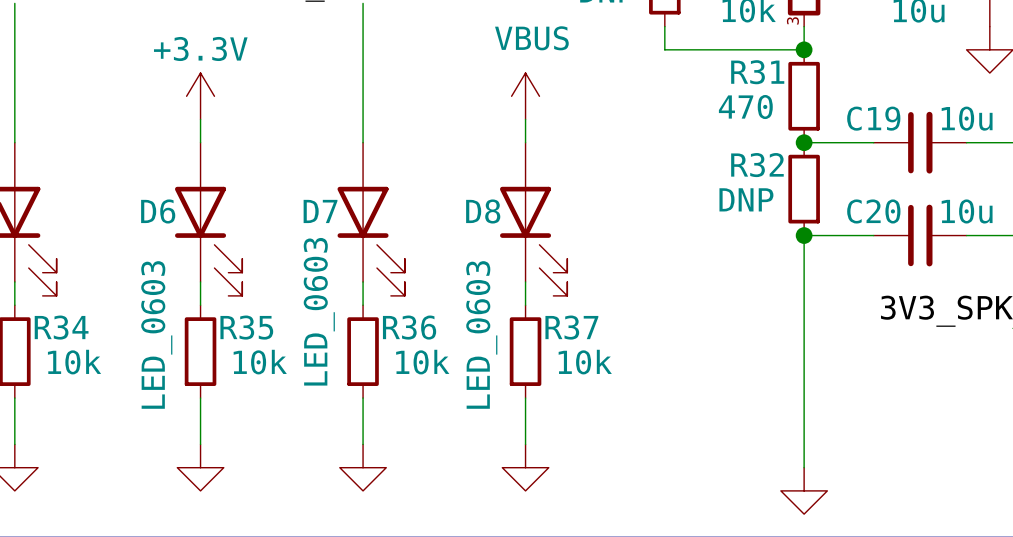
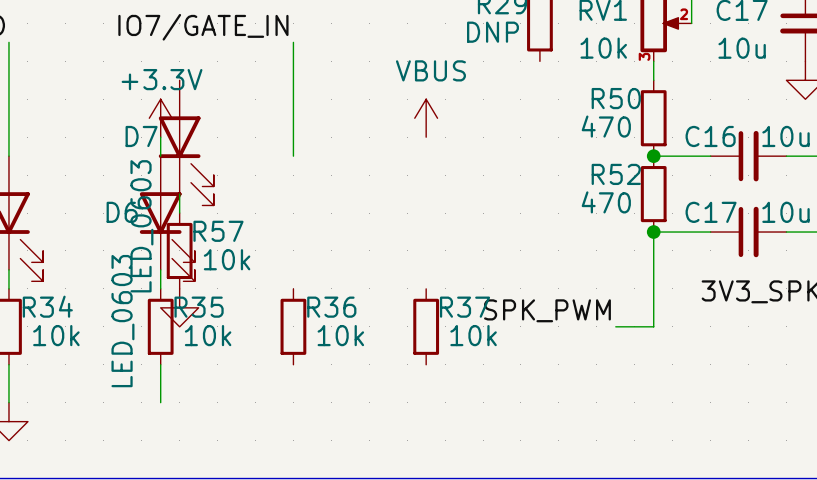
wire: (664, 26) (664, 49) (804, 49) -> none
junction: (804, 49) -> none
R31 name: R31 (757, 72) -> R50 (616, 98)
C19 name: C19 (873, 118) -> C16 (710, 136)
wire: (525, 119) (525, 142) -> none
R32 name: R32 (757, 165) -> R52 (616, 174)
R32 value: DNP (746, 199) -> 470 (606, 202)
C20 name: C20 (873, 211) -> C17 (711, 212)
D7 position: (371, 219) -> (186, 142)
D8: LED_0603 (533, 219) -> none
R57: none -> 10k (179, 250)
wire: (363, 281) (363, 305) -> (179, 194) (179, 213)
wire: (525, 281) (525, 305) -> none
power symbol: none -> (179, 307)
label: none -> SPK_PWM (547, 310)
wire: (804, 351) (804, 467) -> (653, 326) (615, 326)
wire: (363, 398) (363, 444) -> none
wire: (525, 398) (525, 444) -> none
power symbol: (200, 467) -> none
power symbol: (363, 467) -> none
power symbol: (525, 467) -> none
power symbol: (804, 490) -> none

